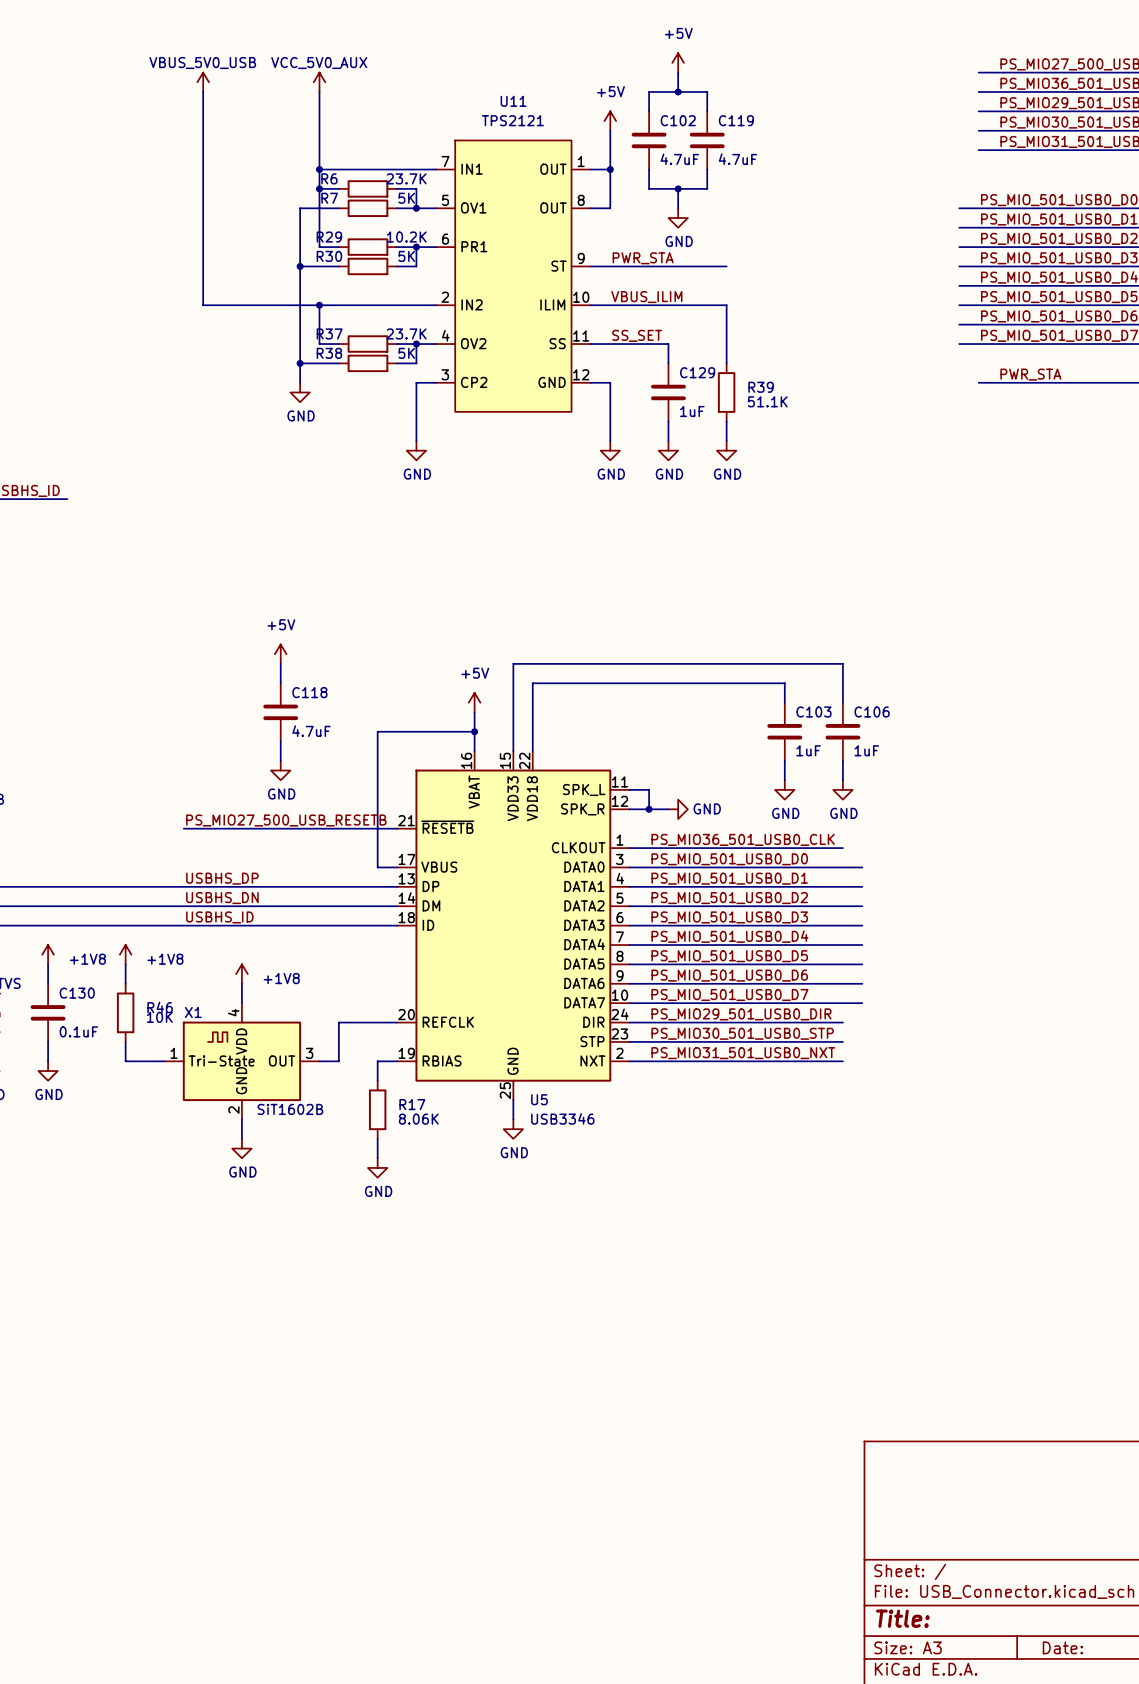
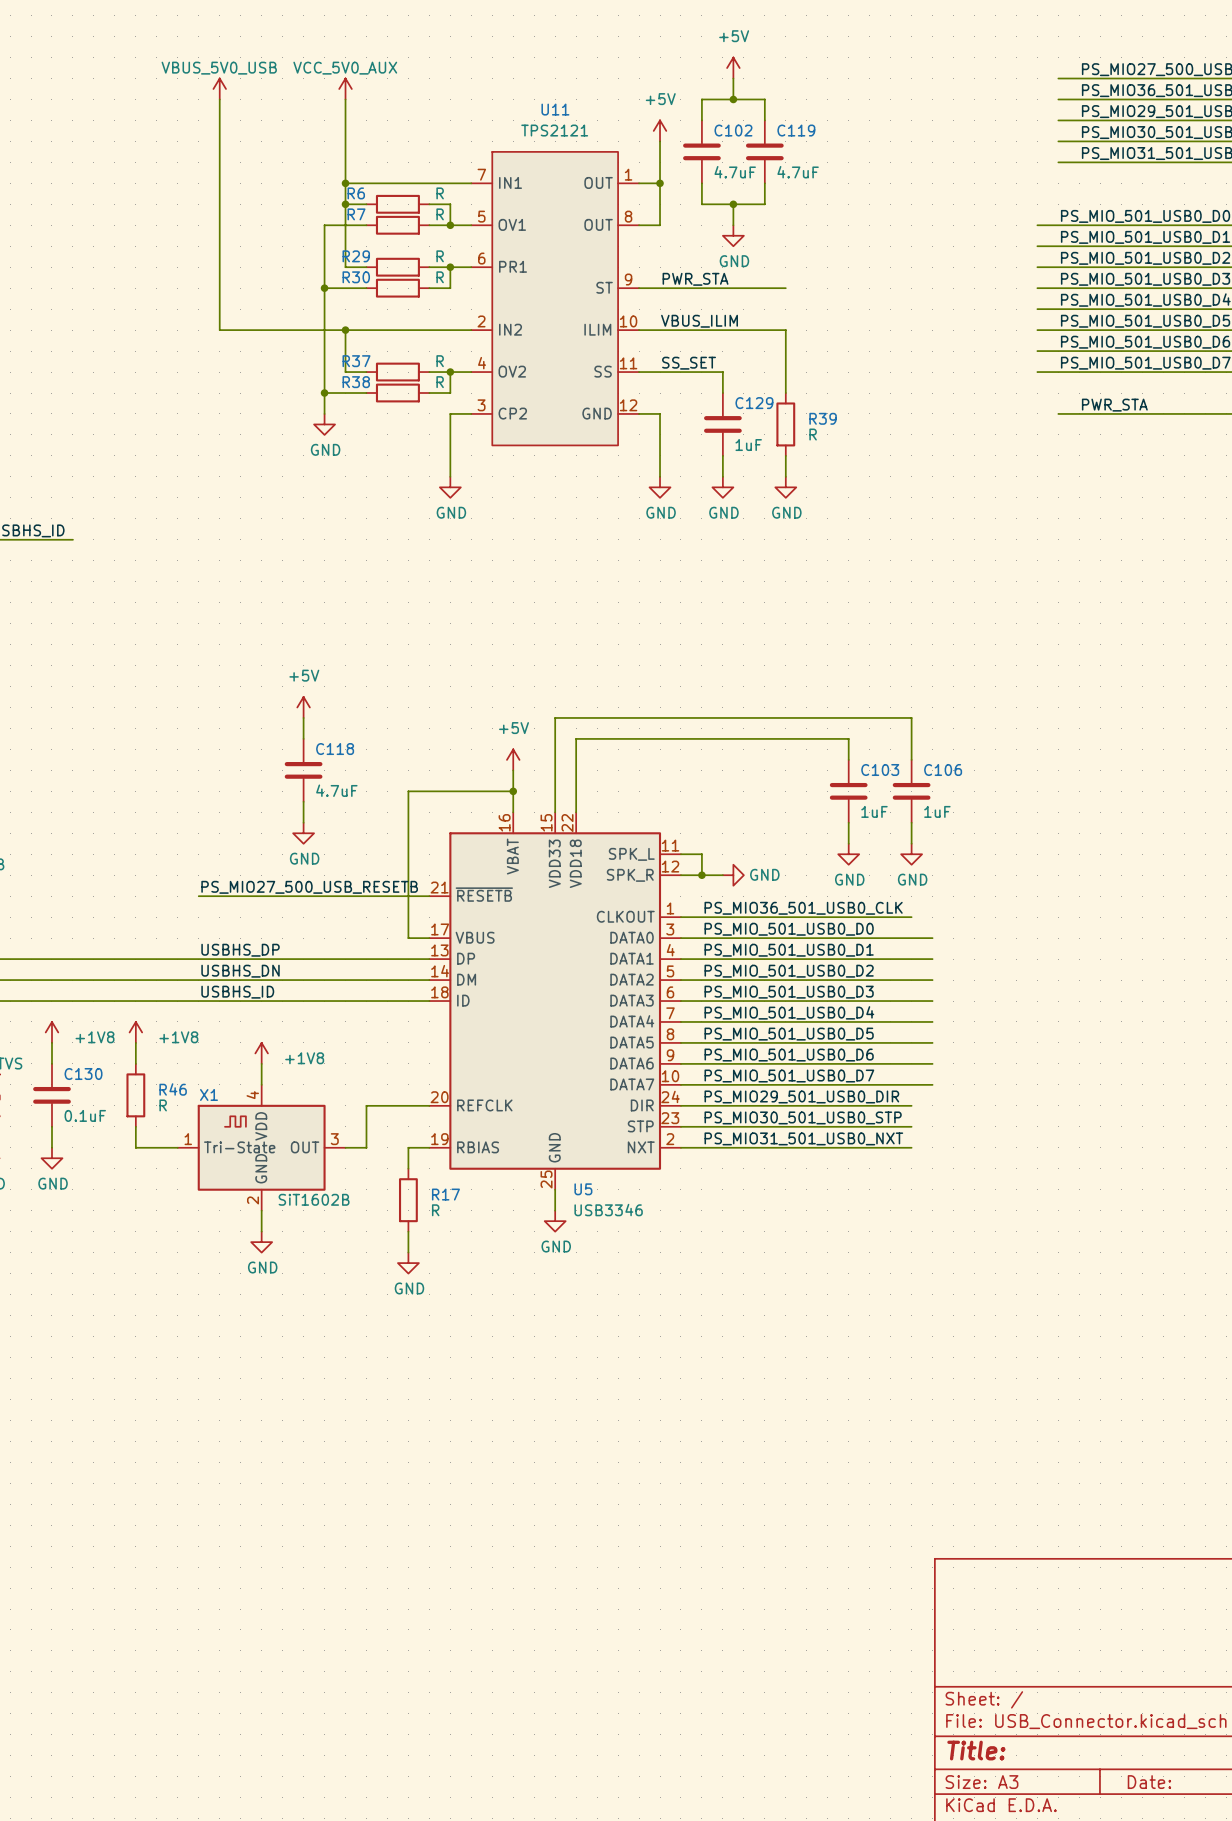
R6 value: 23.7K (406, 178) -> R (440, 193)
R7 value: 5K (406, 198) -> R (440, 214)
R29 value: 10.2K (406, 237) -> R (440, 256)
R30 value: 5K (406, 256) -> R (440, 277)
R37 value: 23.7K (406, 333) -> R (440, 361)
R38 value: 5K (406, 353) -> R (440, 382)
R39 value: 51.1K (767, 401) -> R (813, 434)
R46 value: 10K (159, 1017) -> R (163, 1105)
R17 value: 8.06K (418, 1119) -> R (435, 1210)

